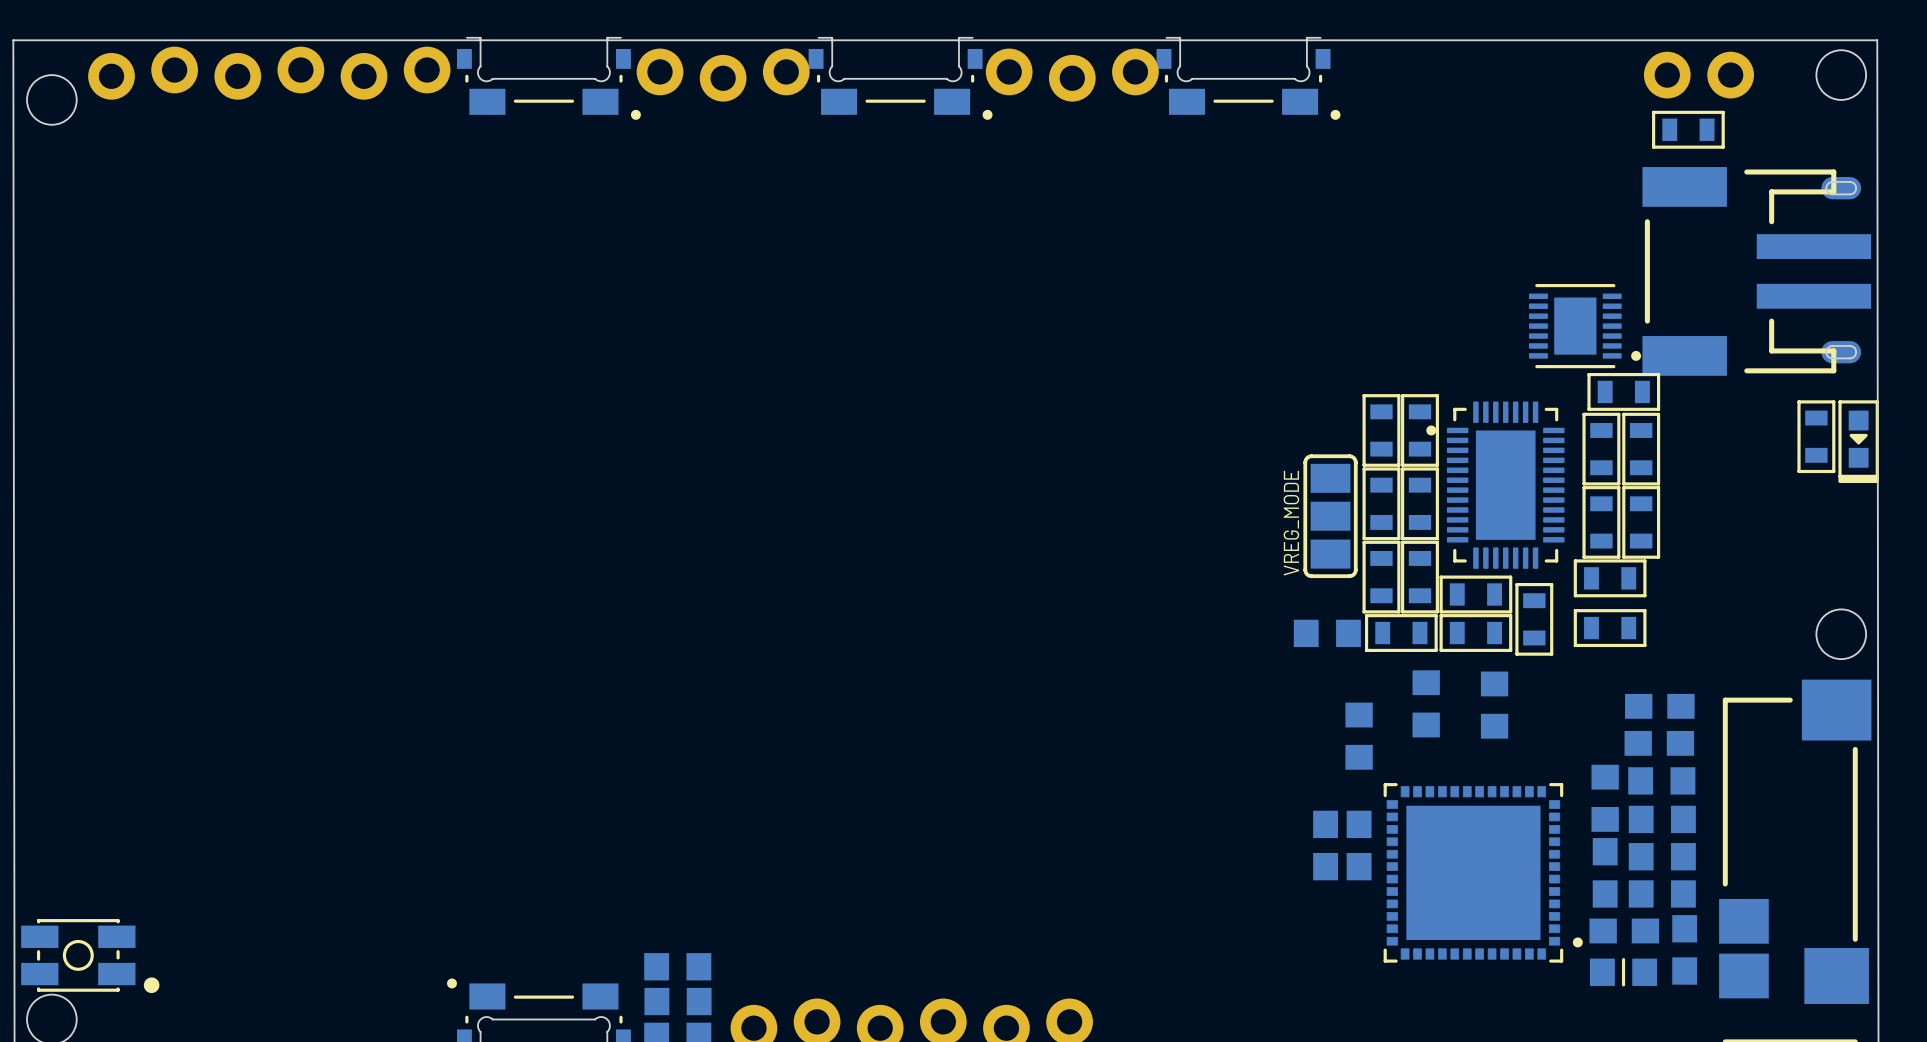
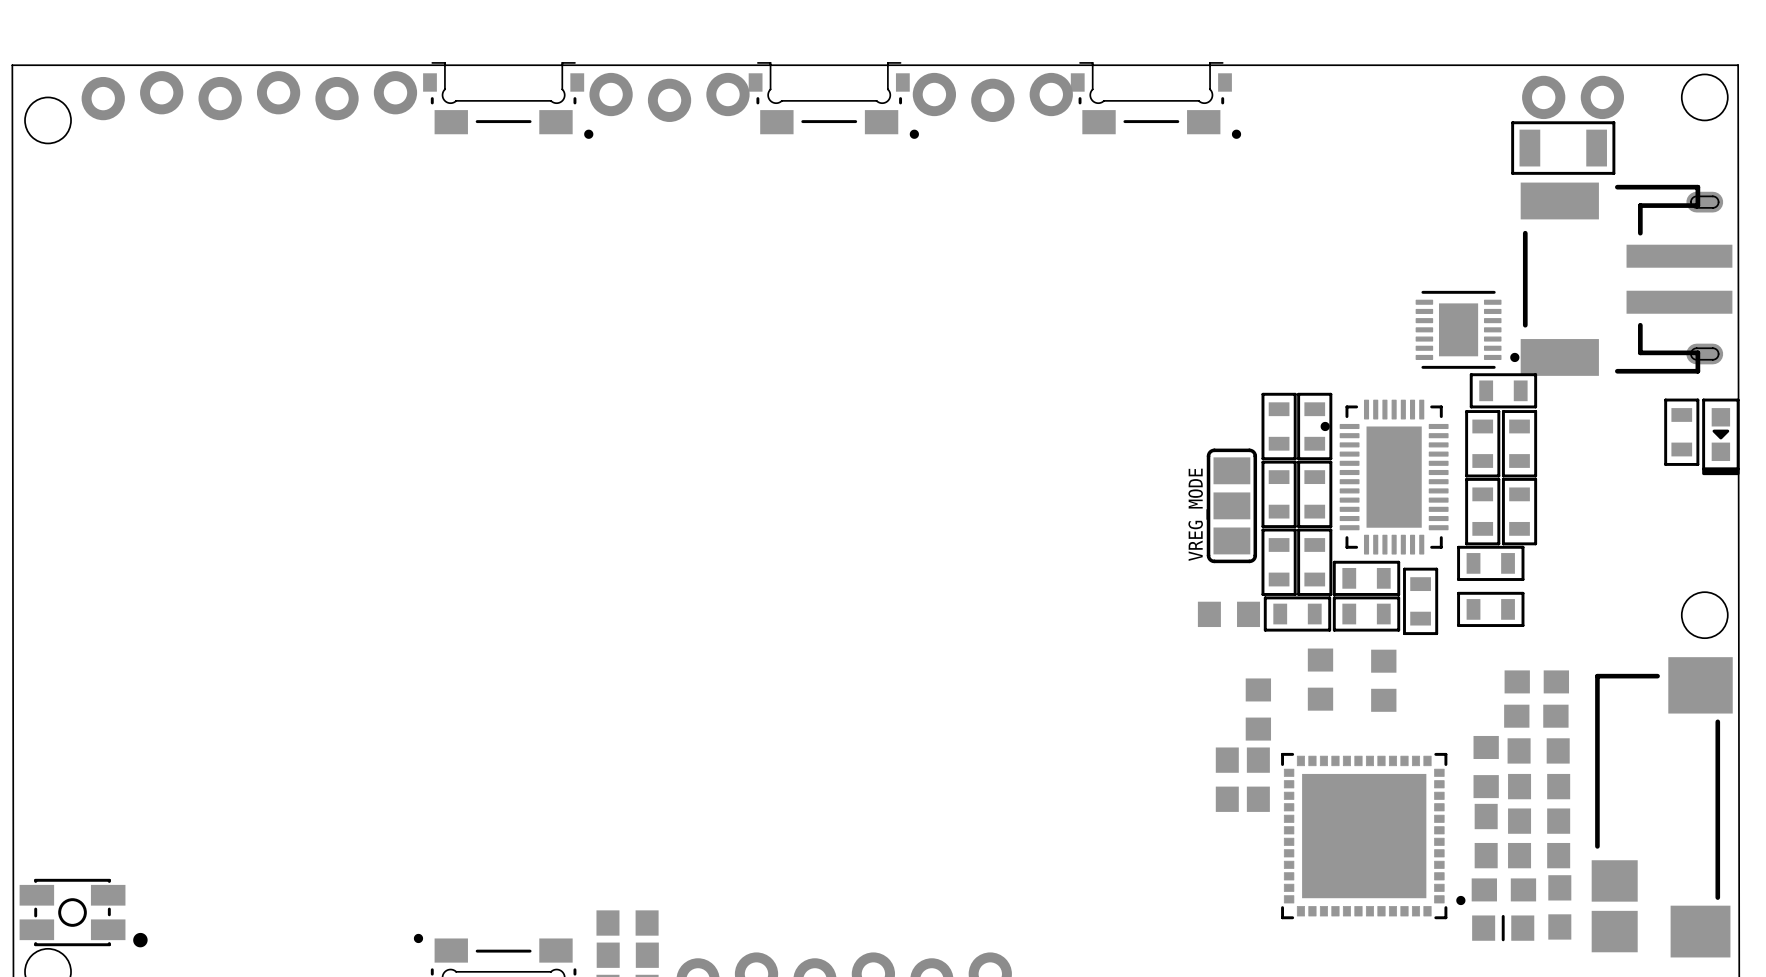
part footprint: [1652, 110, 1725, 149] -> [1511, 121, 1616, 175]
part: none -> (1227, 779)
part: none -> (1258, 779)
part: (1325, 845) -> none
part: (1359, 845) -> none

